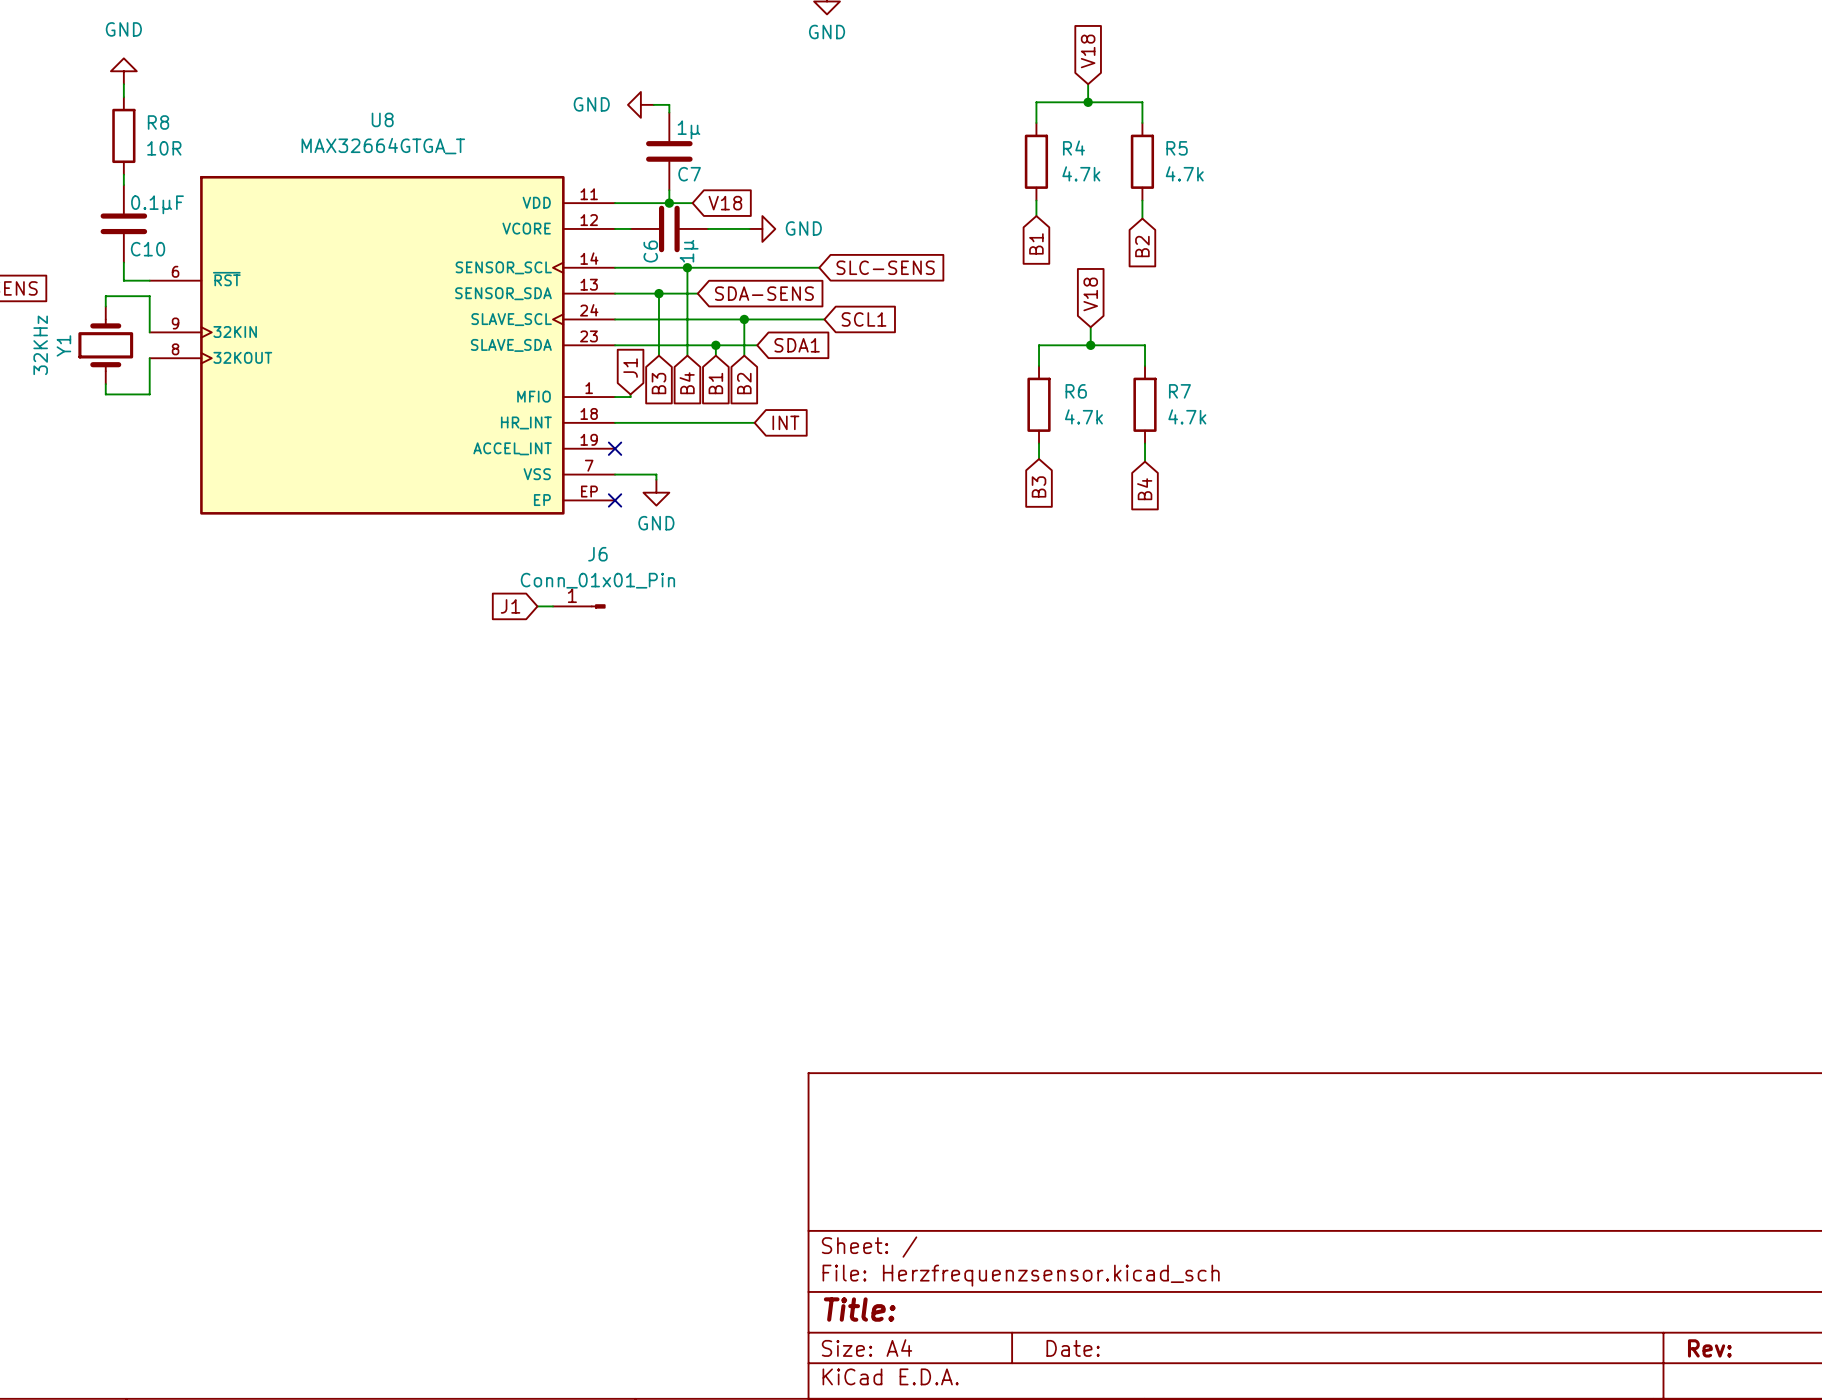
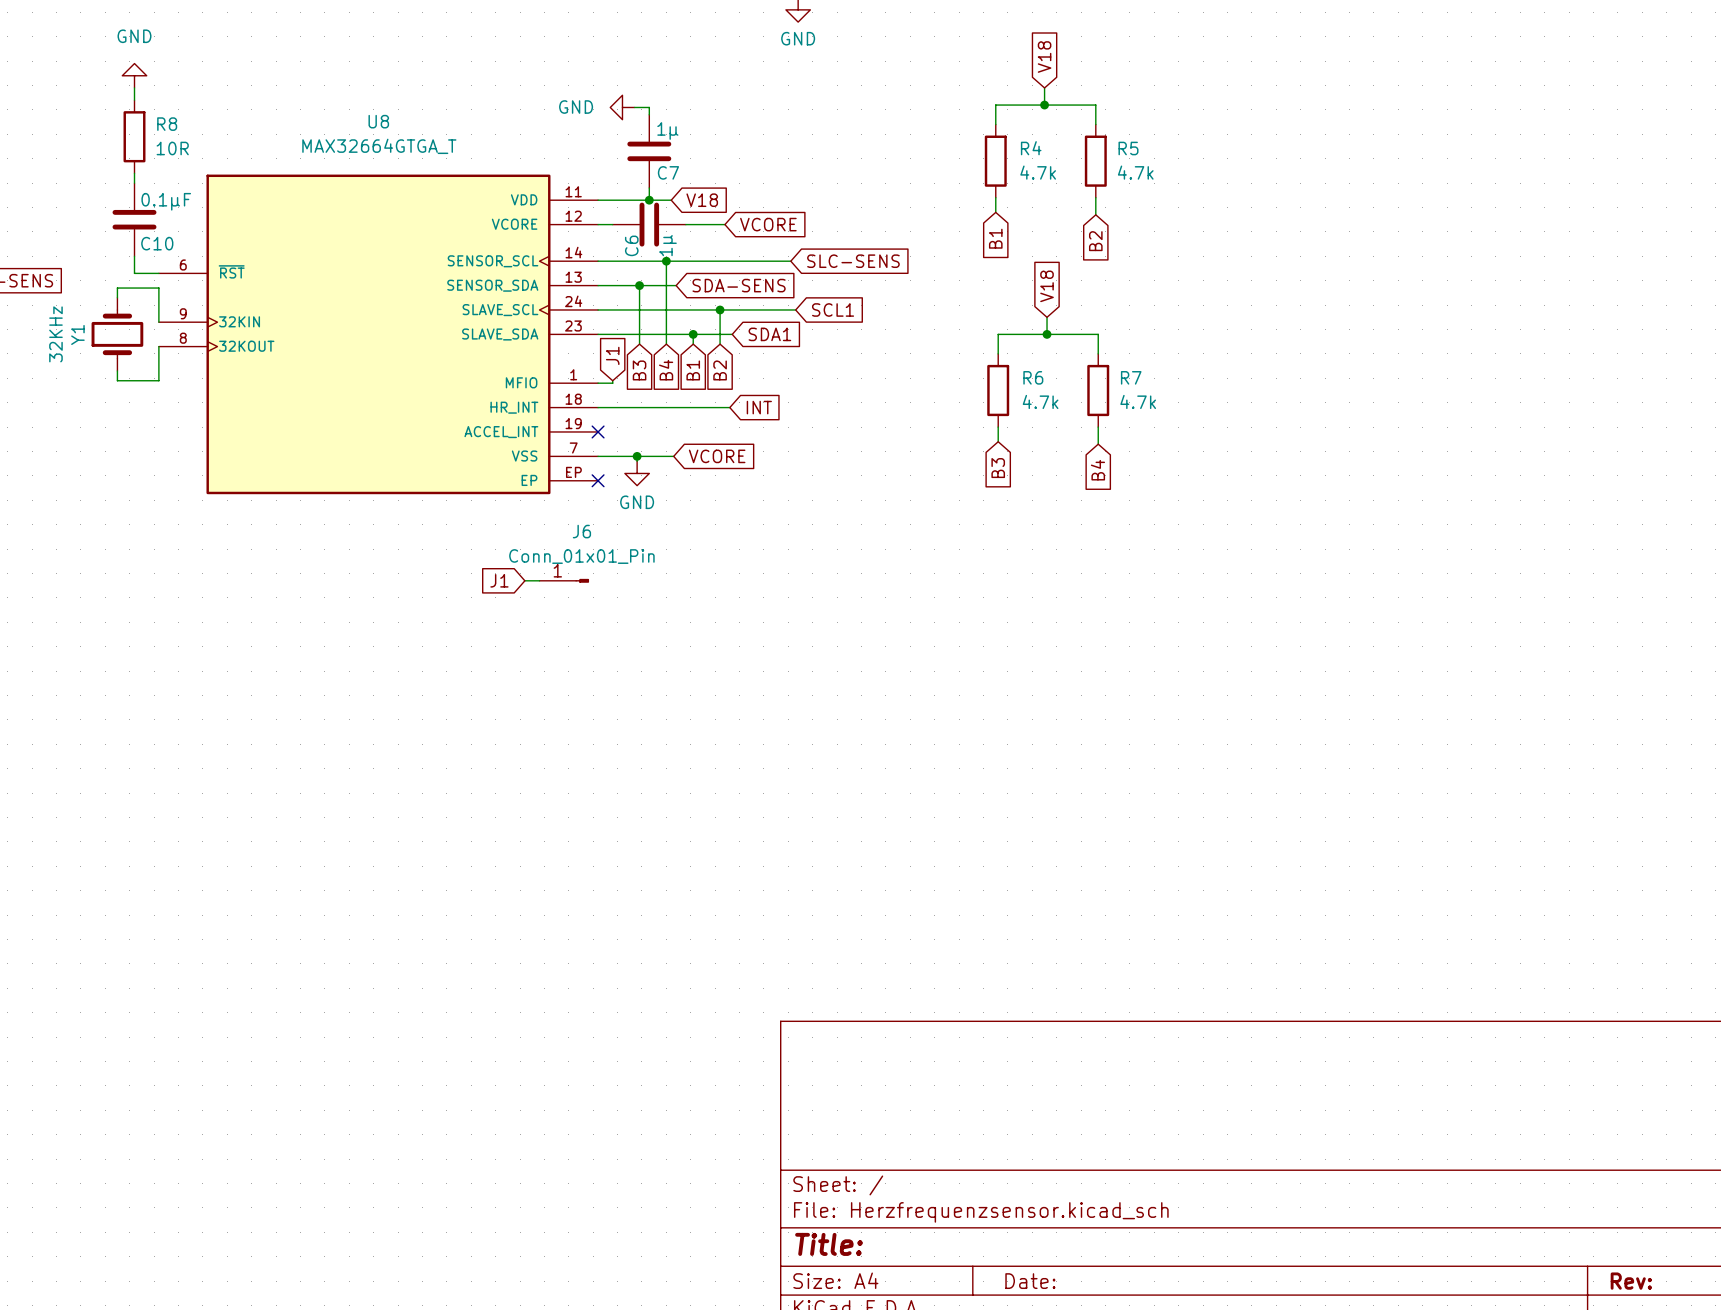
power symbol: GND (762, 228) -> none
global label: none -> VCORE (768, 224)
wire: none -> (637, 456) (673, 456)
junction: none -> (637, 456)
global label: none -> VCORE (717, 456)

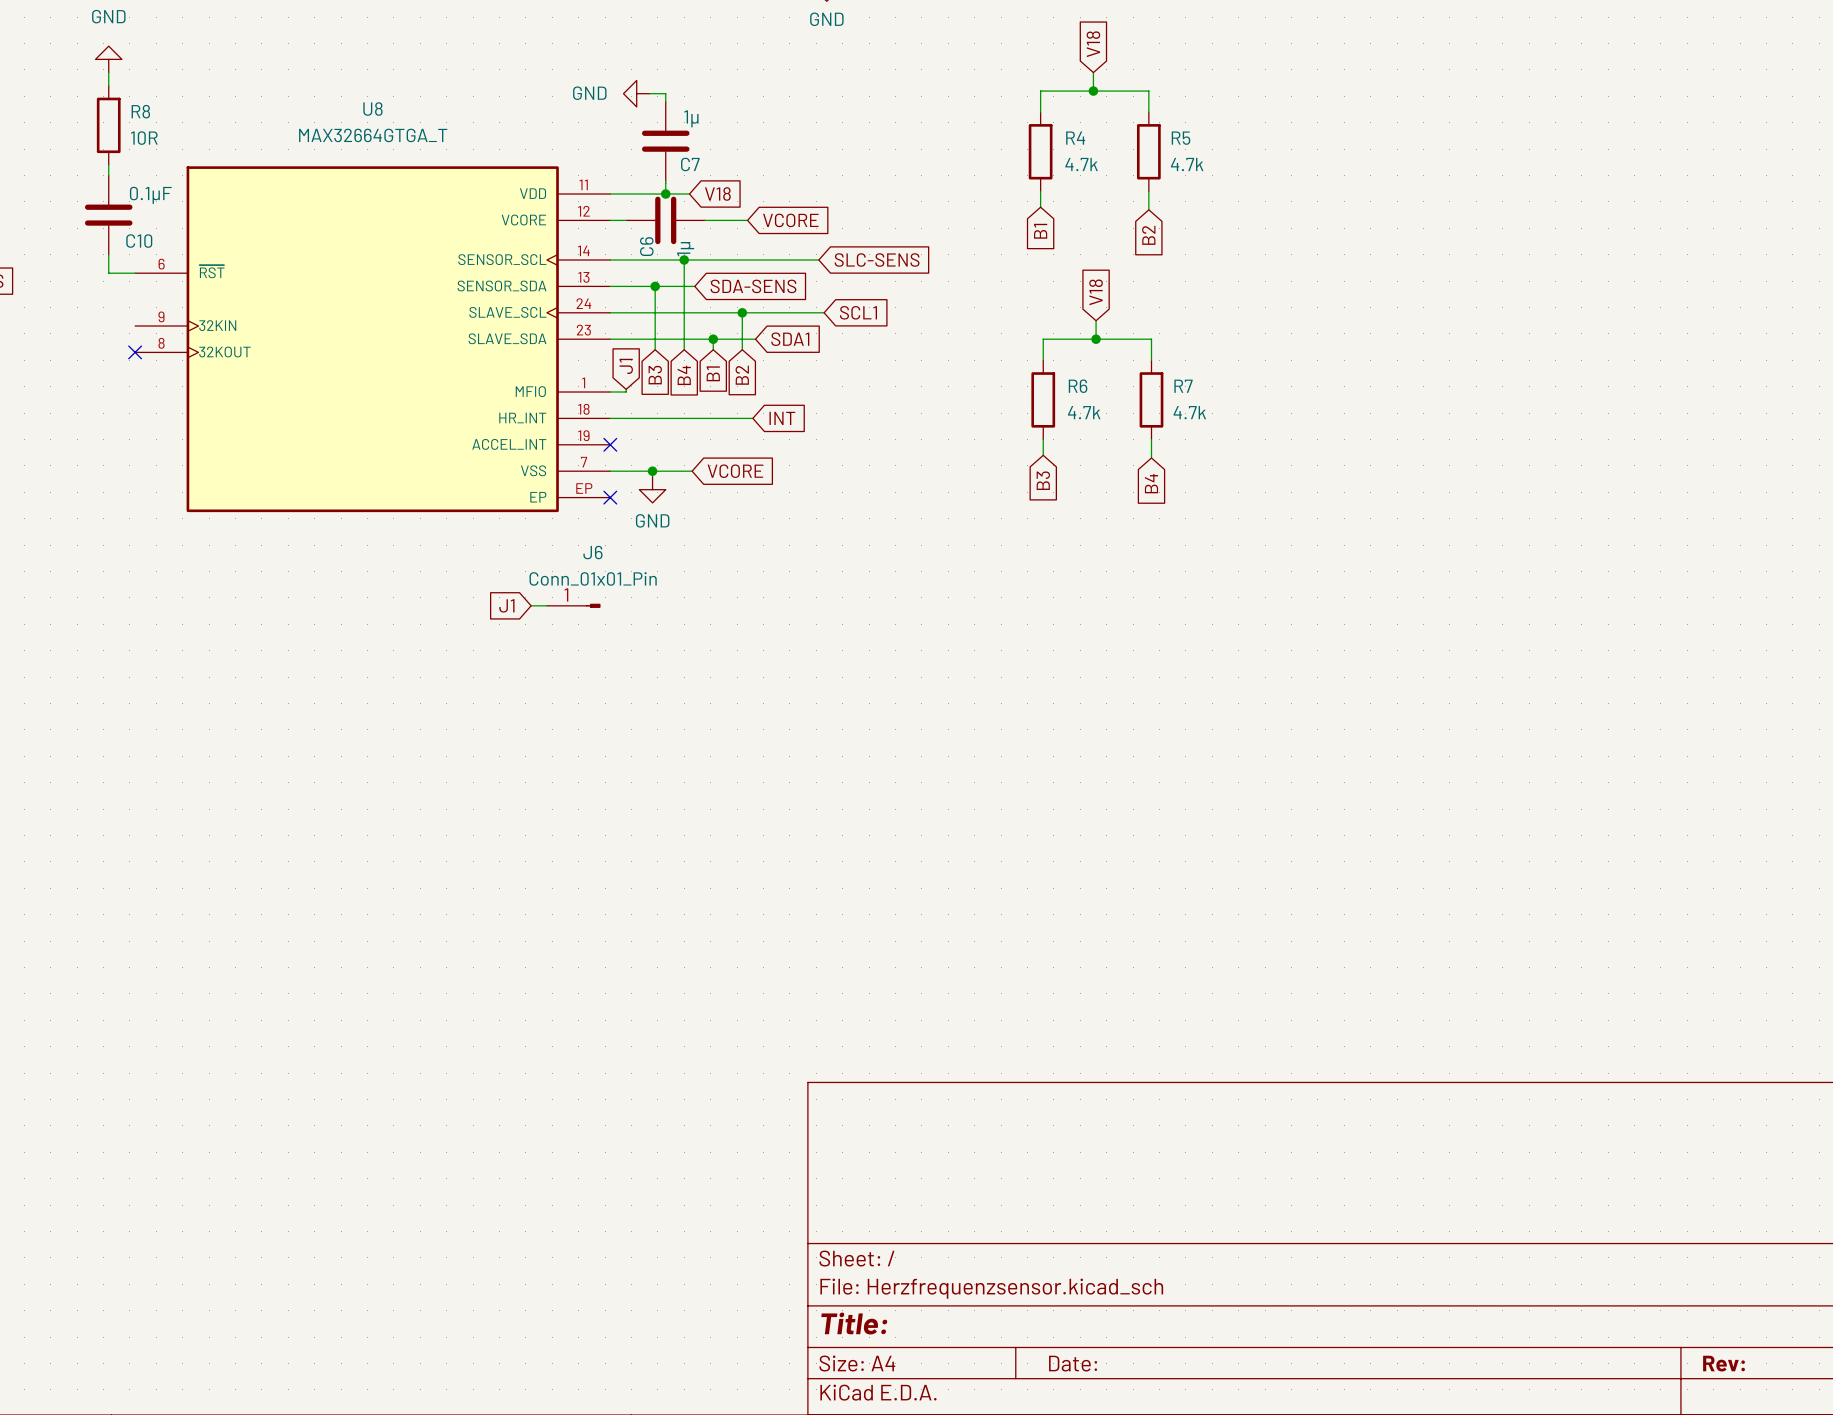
wire: (117, 297) (117, 288) (158, 288) (158, 322) -> none
Y1: 32KHz (117, 334) -> none
wire: (158, 346) (158, 380) (117, 380) (117, 370) -> none
no-connect mark: none -> (135, 352)

